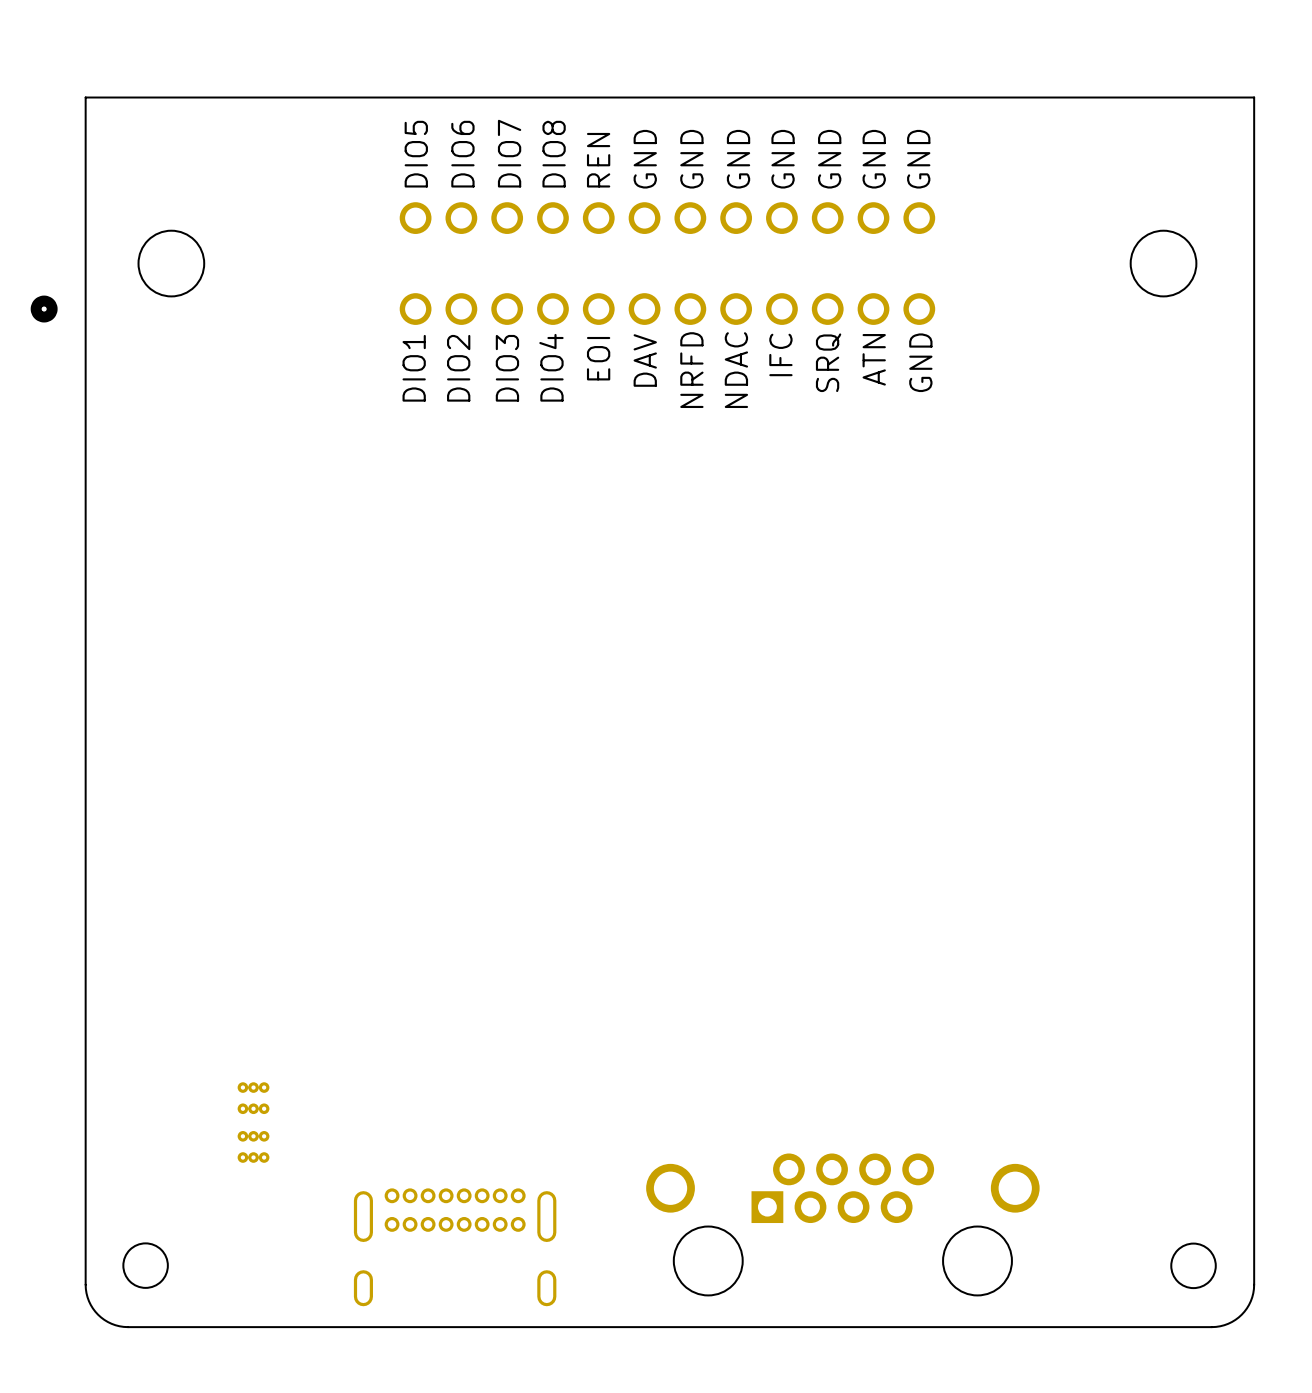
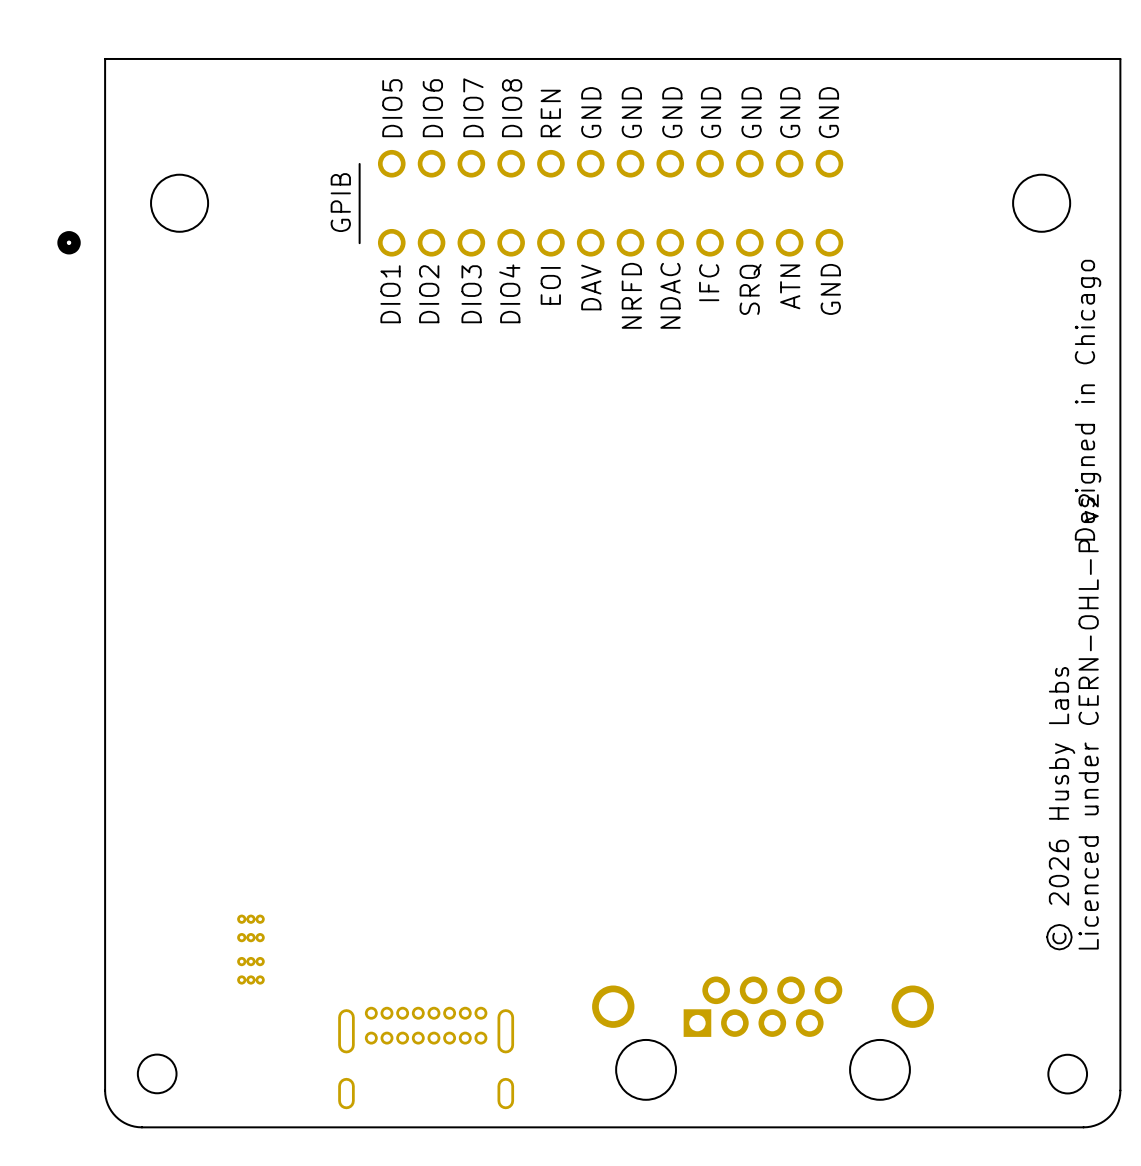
line: none -> (359, 163) (359, 243)
text: none -> GPIB (340, 202)
text: none -> Designed in Chicago (1088, 400)
text: none -> Licenced under CERN-OHL-P v2 (1088, 721)
text: none -> © 2026 Husby Labs (1060, 808)

